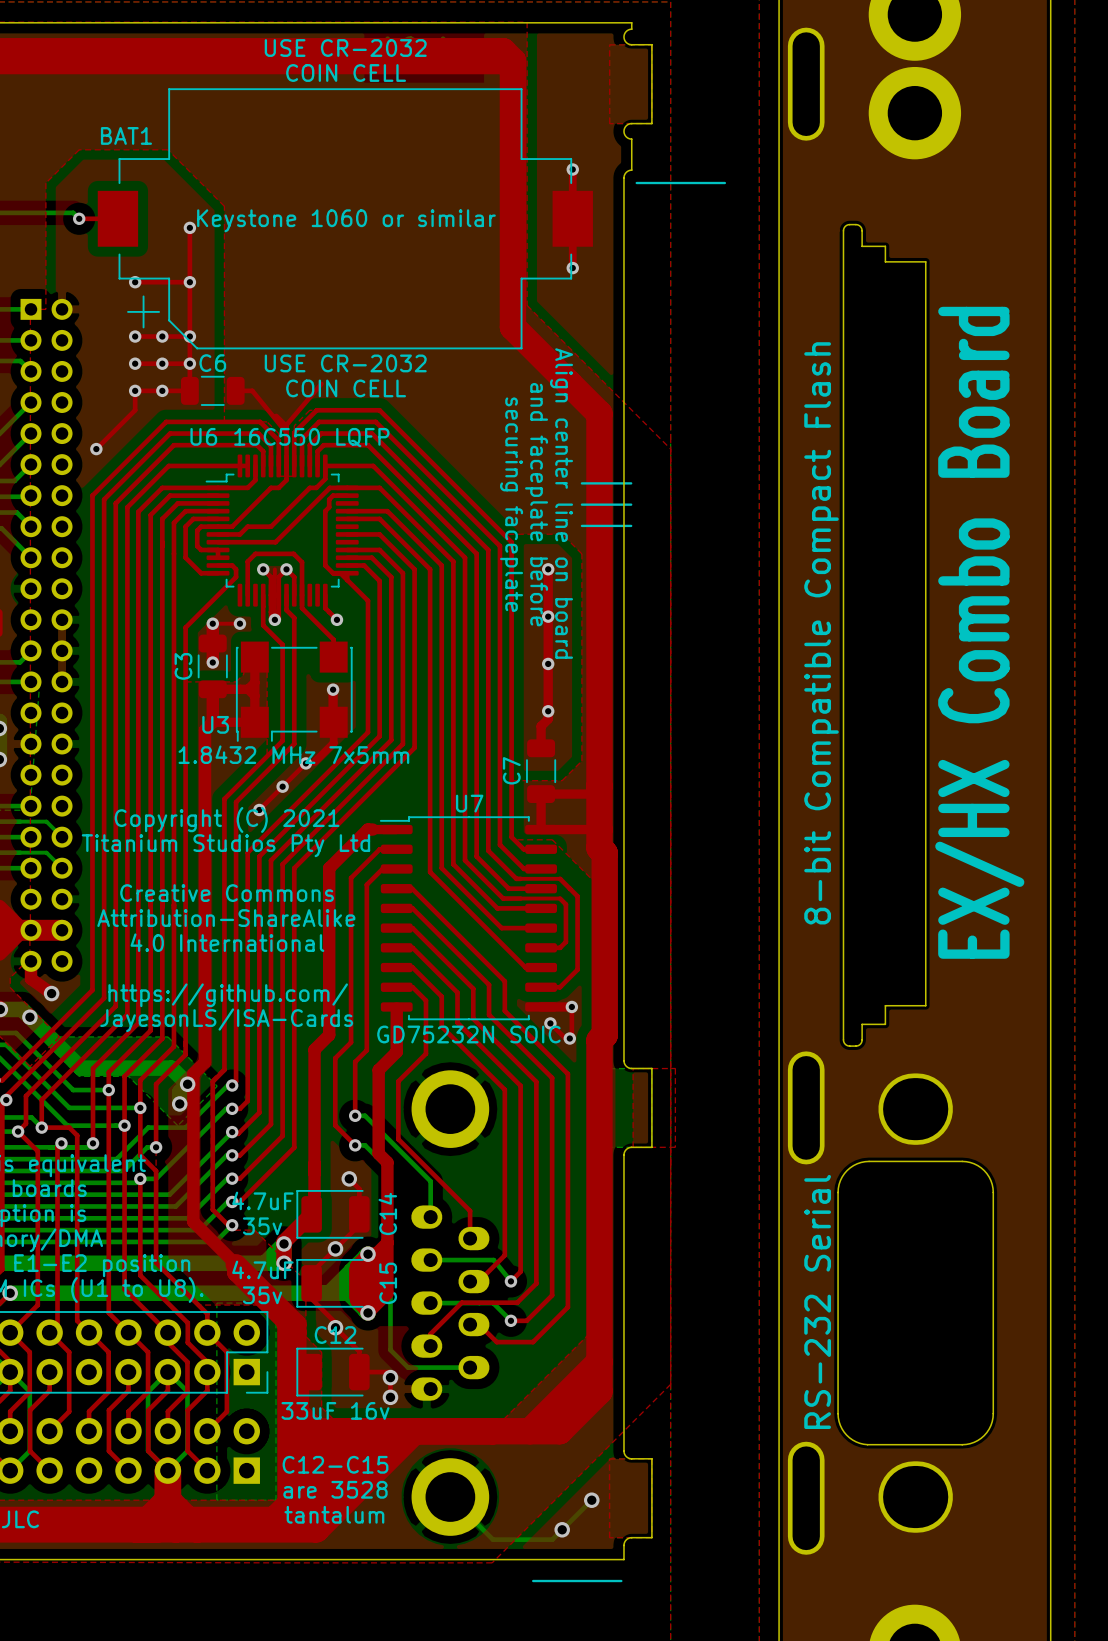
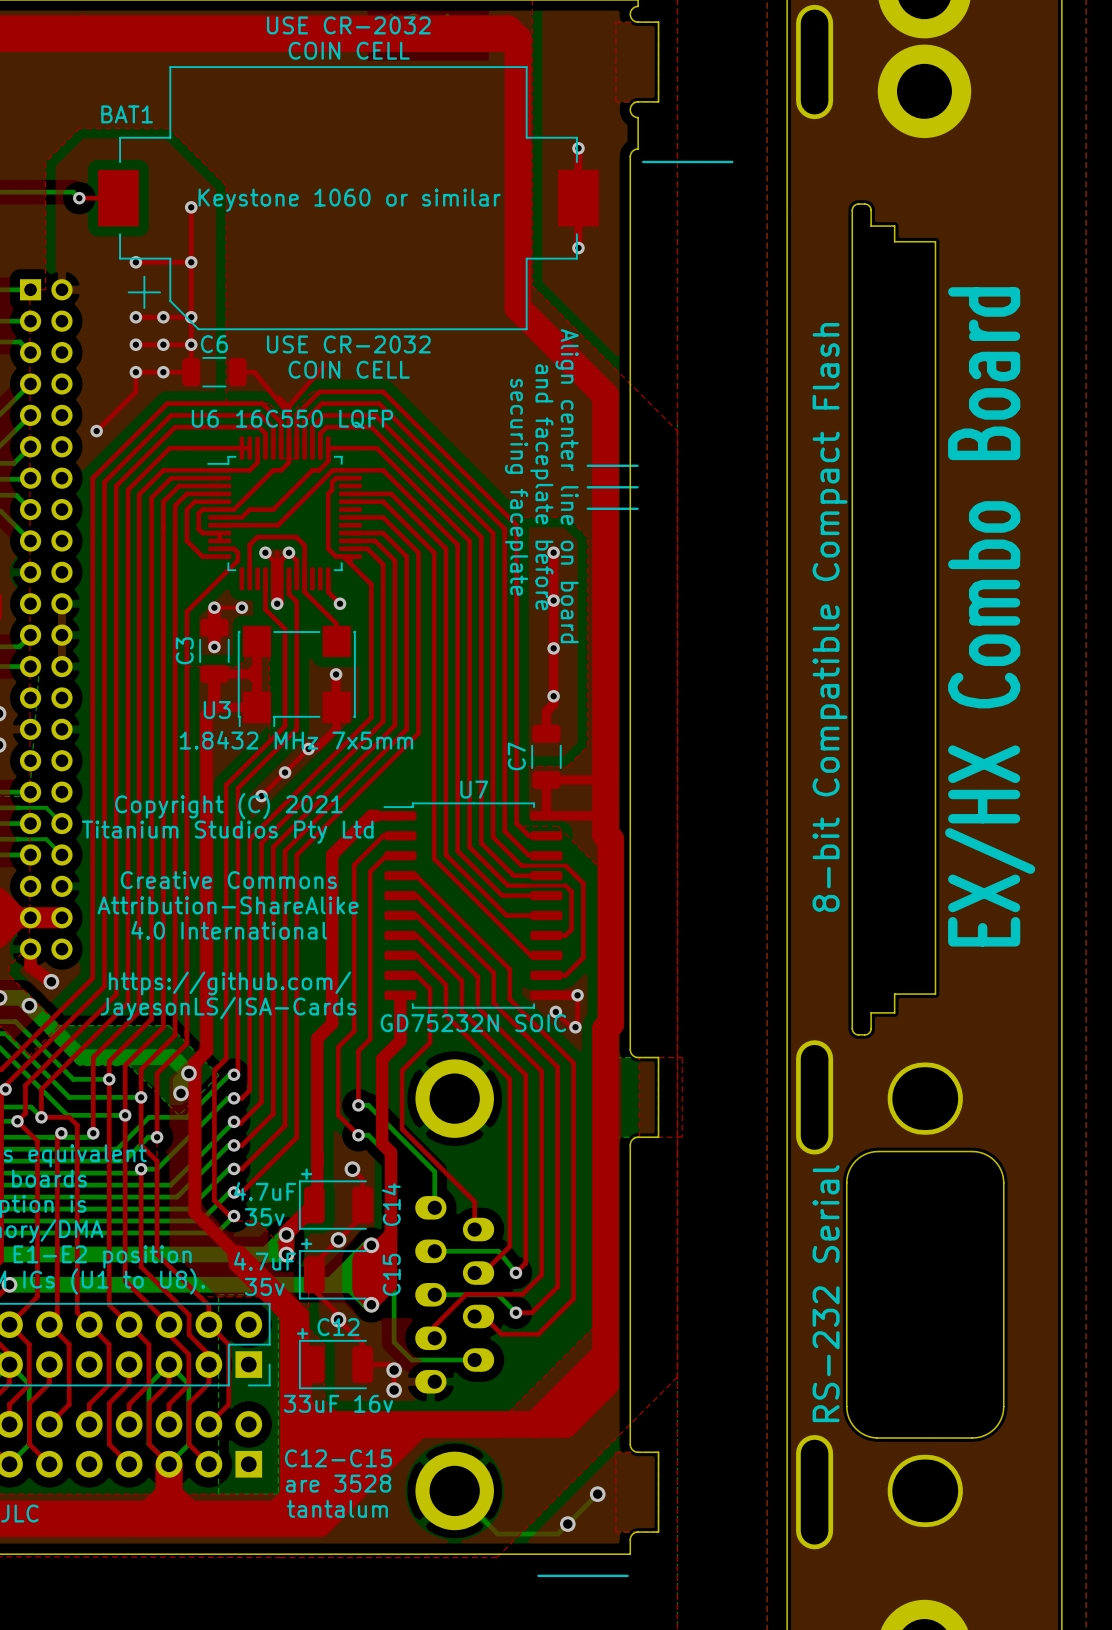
C14 text: none -> + (306, 1174)
C15 text: none -> + (306, 1243)
C12 text: none -> + (302, 1333)

